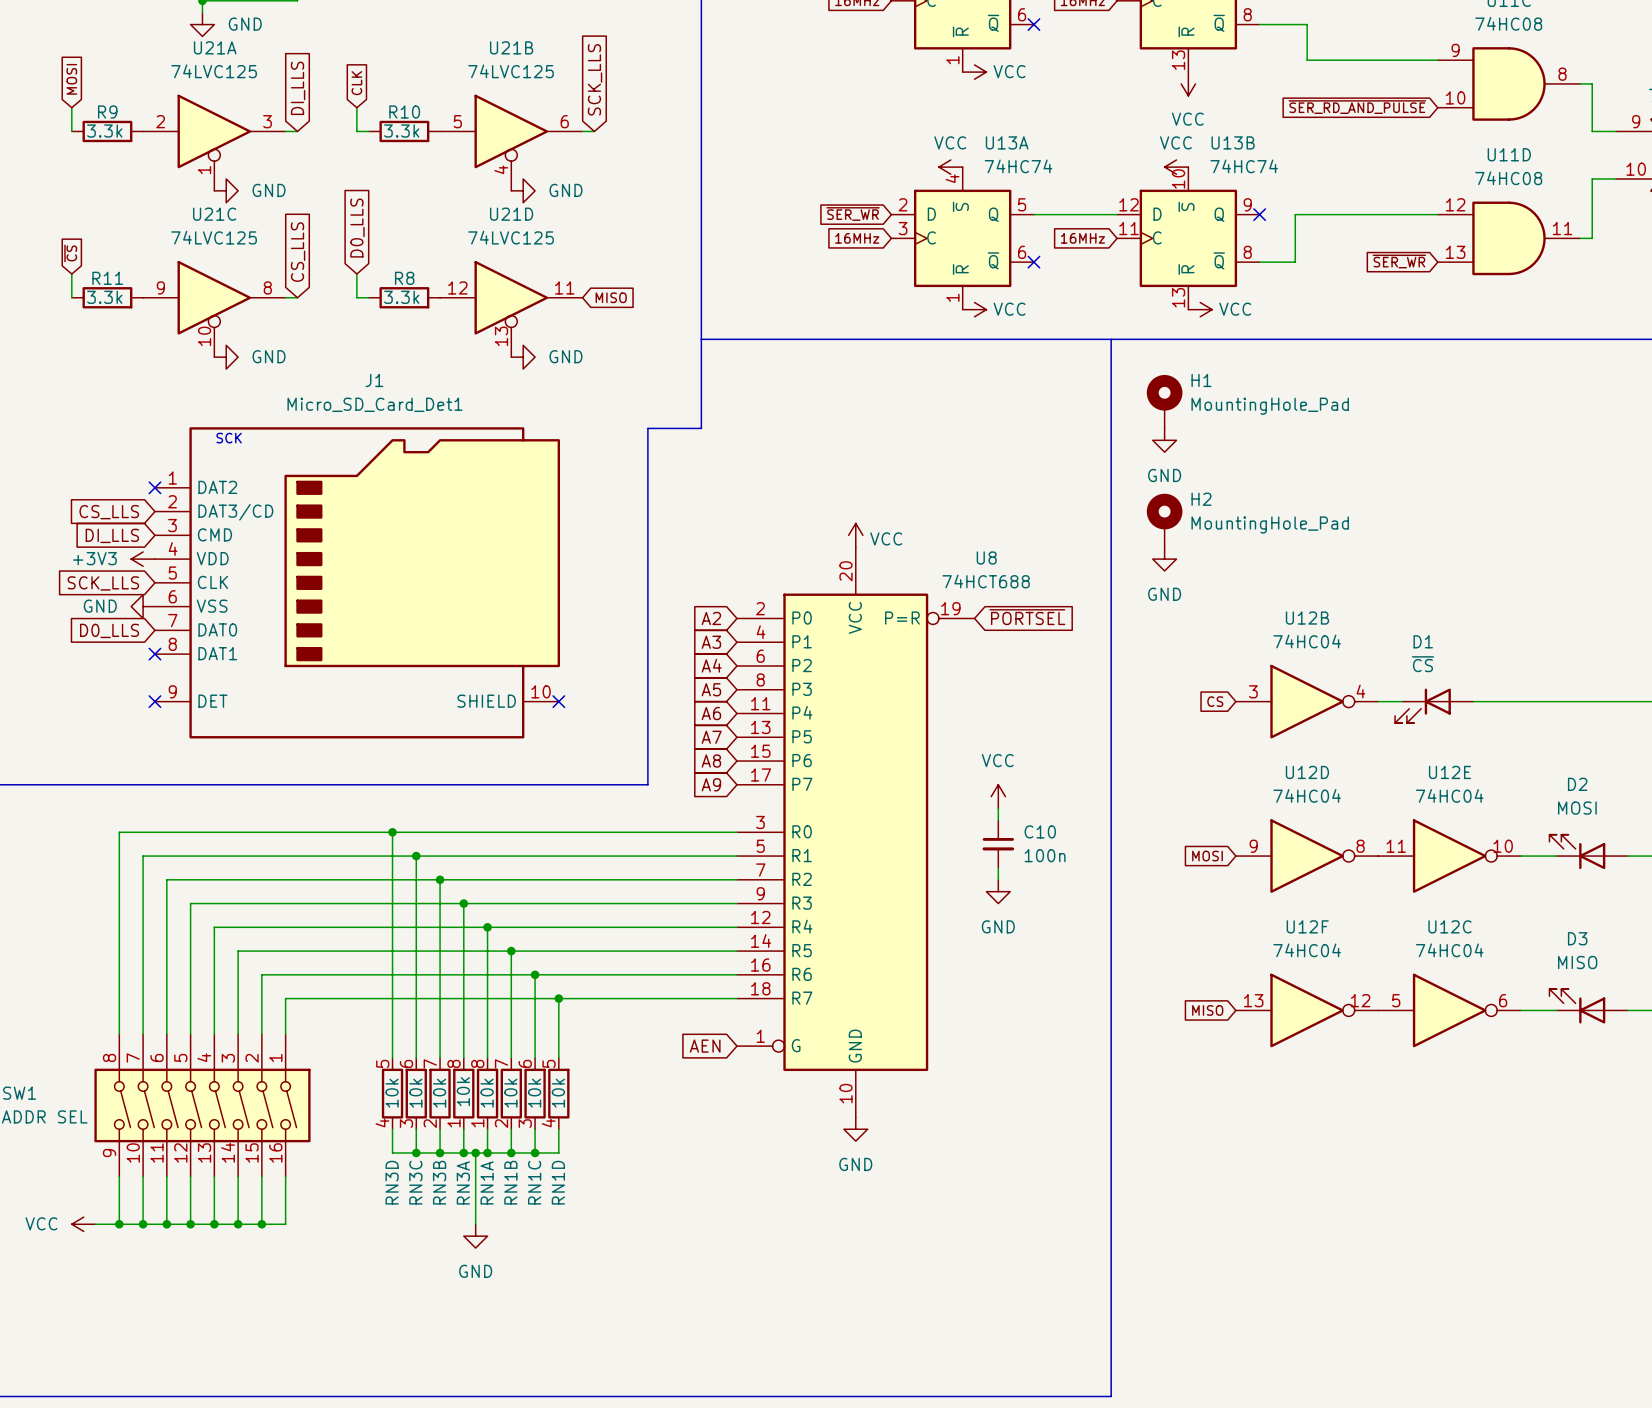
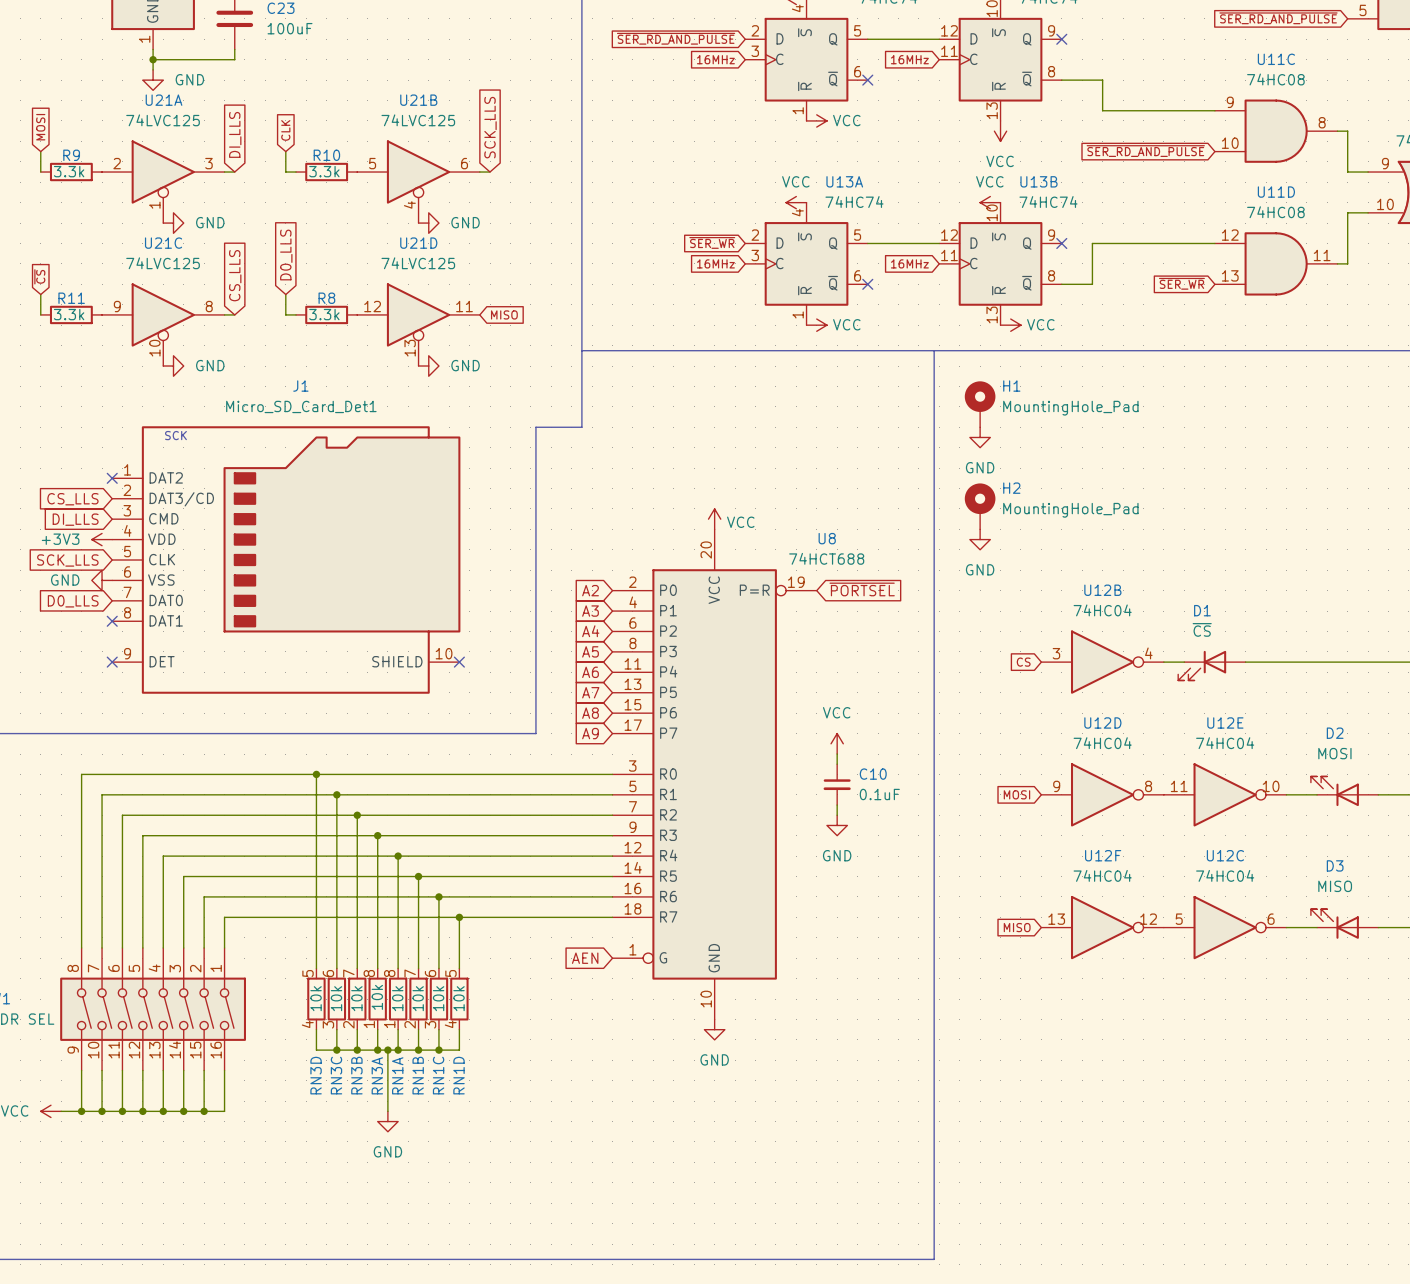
C10 value: 100n (1045, 855) -> 0.1uF (879, 794)

